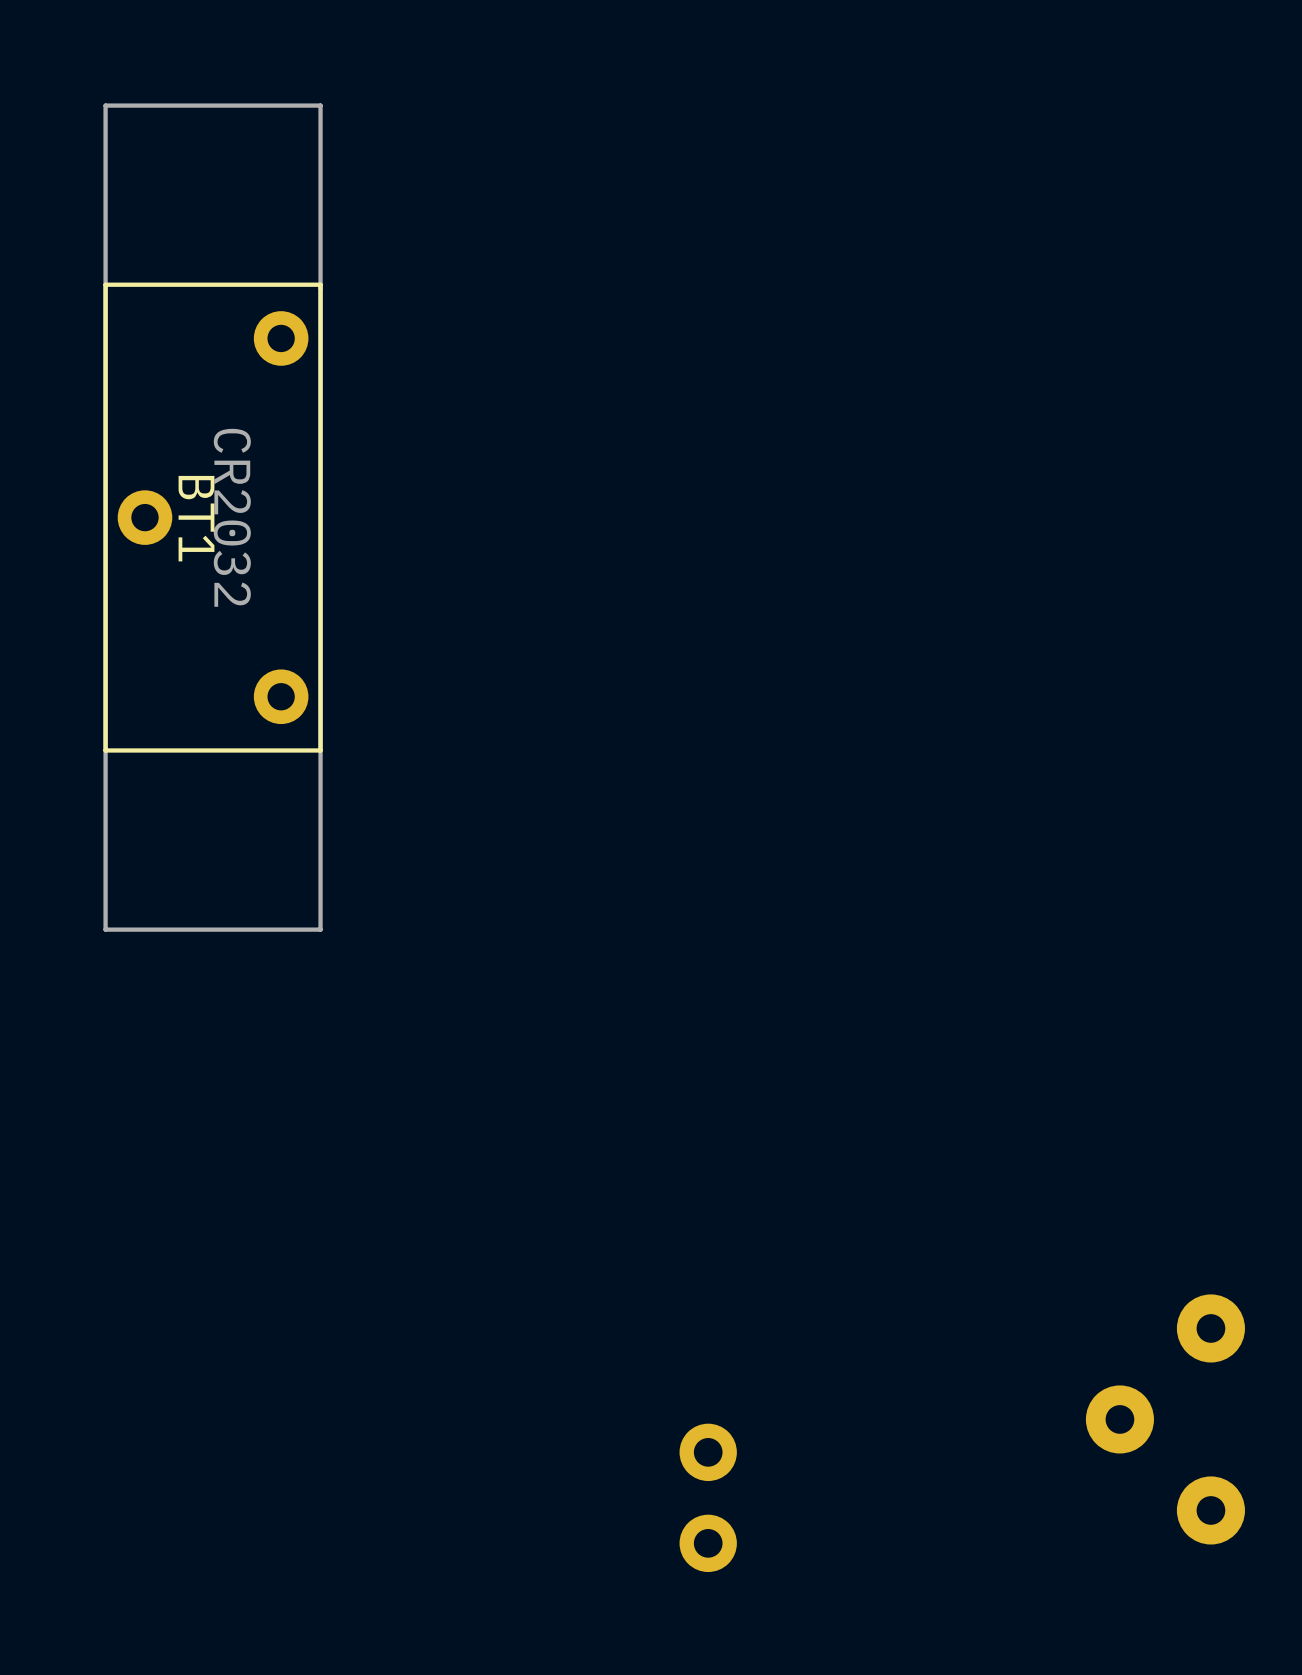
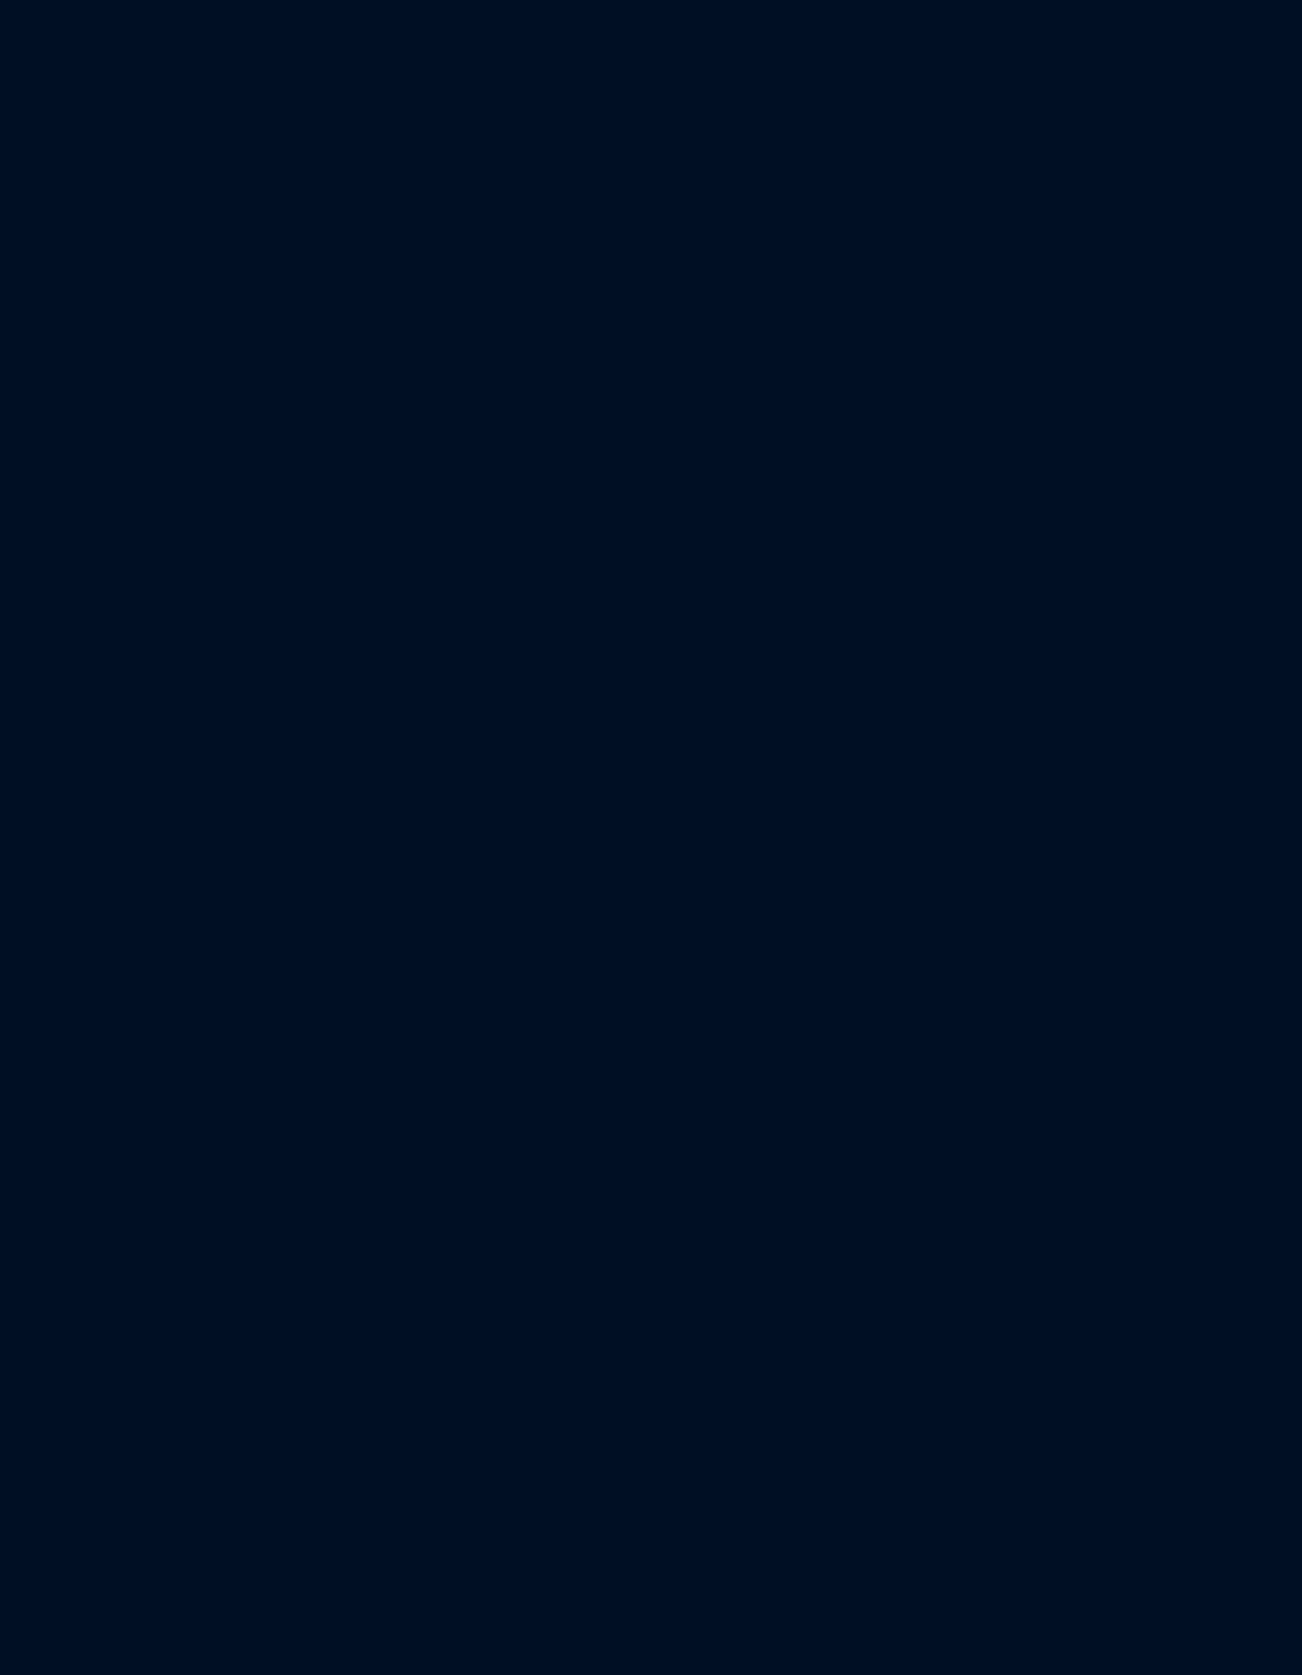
BT1: CR2032 (213, 517) -> none
part: (1165, 1419) -> none
part: (708, 1497) -> none

